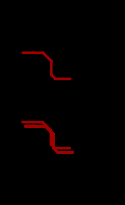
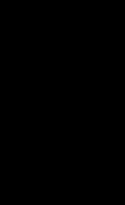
top track: (33, 52) (22, 52) -> none
top track: (33, 52) (43, 52) (51, 61) (51, 74) (55, 78) (70, 78) -> none
top track: (33, 122) (22, 122) -> none
top track: (33, 122) (42, 122) (50, 130) (50, 144) (54, 148) (69, 148) -> none
top track: (36, 126) (25, 126) -> none
top track: (36, 126) (45, 126) (53, 134) (53, 148) (57, 152) (72, 152) -> none

